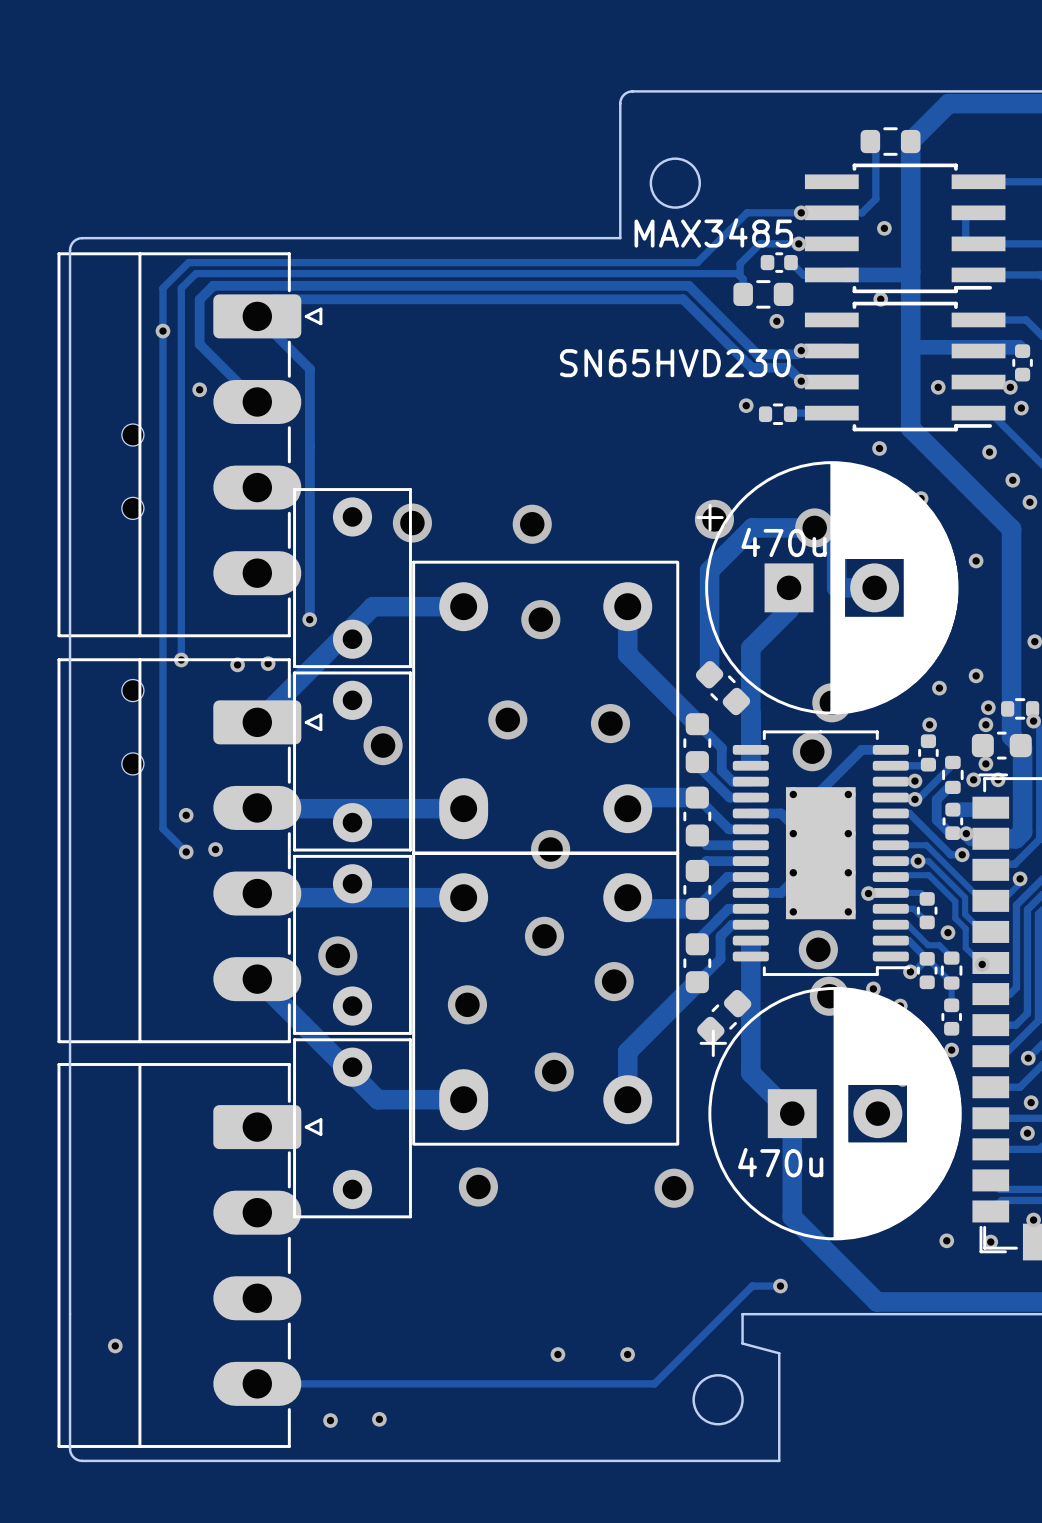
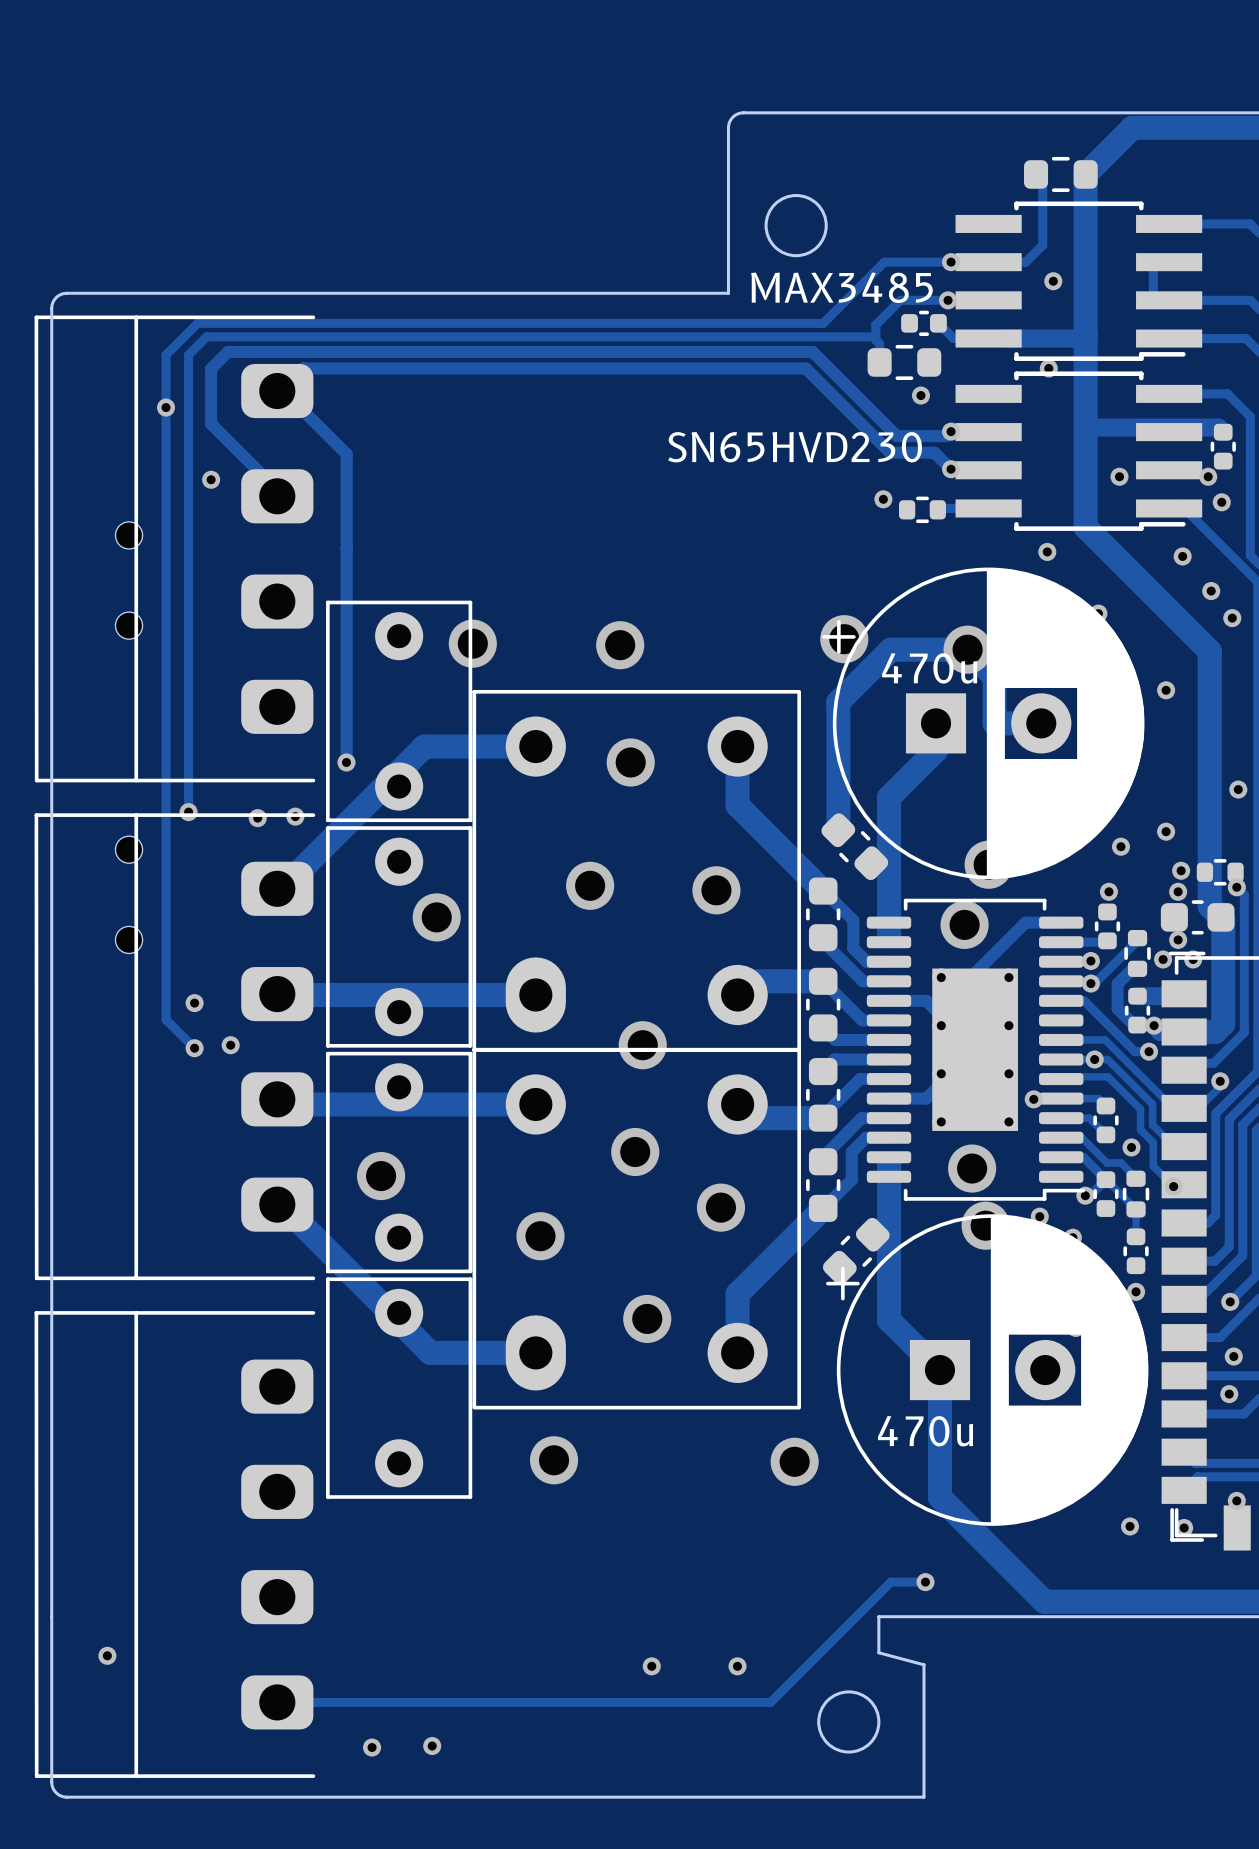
part footprint: [57, 252, 323, 638] -> [34, 315, 316, 783]
part footprint: [57, 658, 323, 1044] -> [34, 813, 316, 1281]
part footprint: [57, 1063, 323, 1448] -> [34, 1311, 316, 1778]

